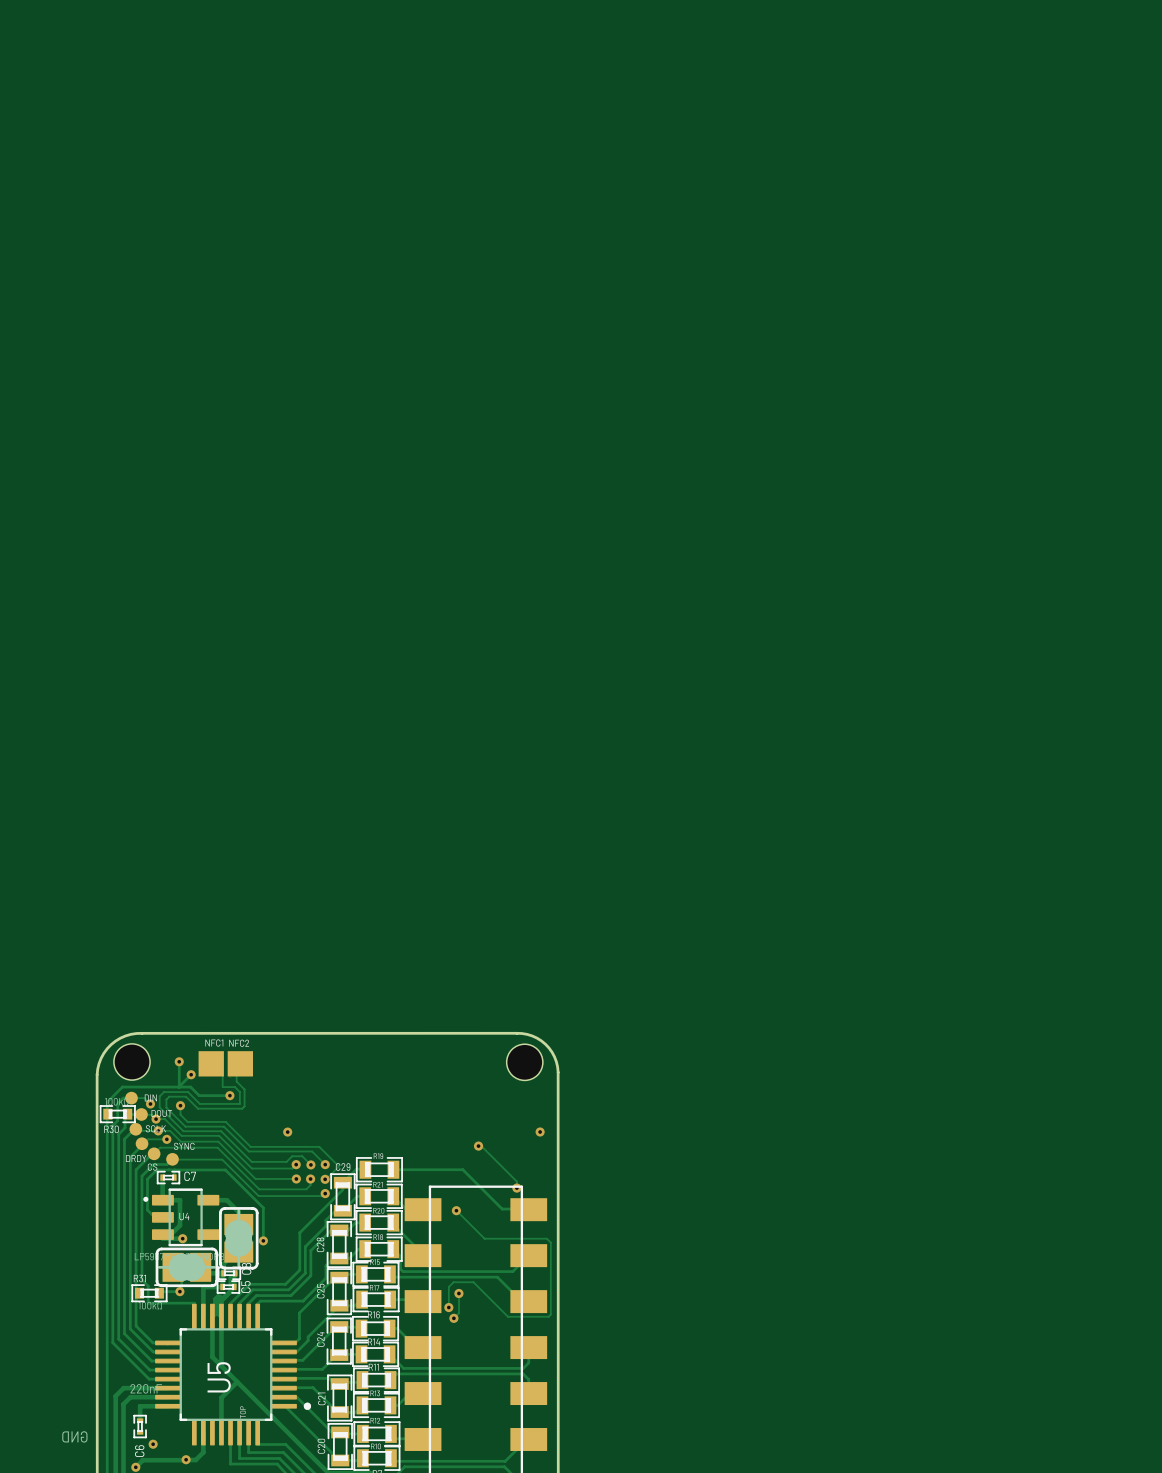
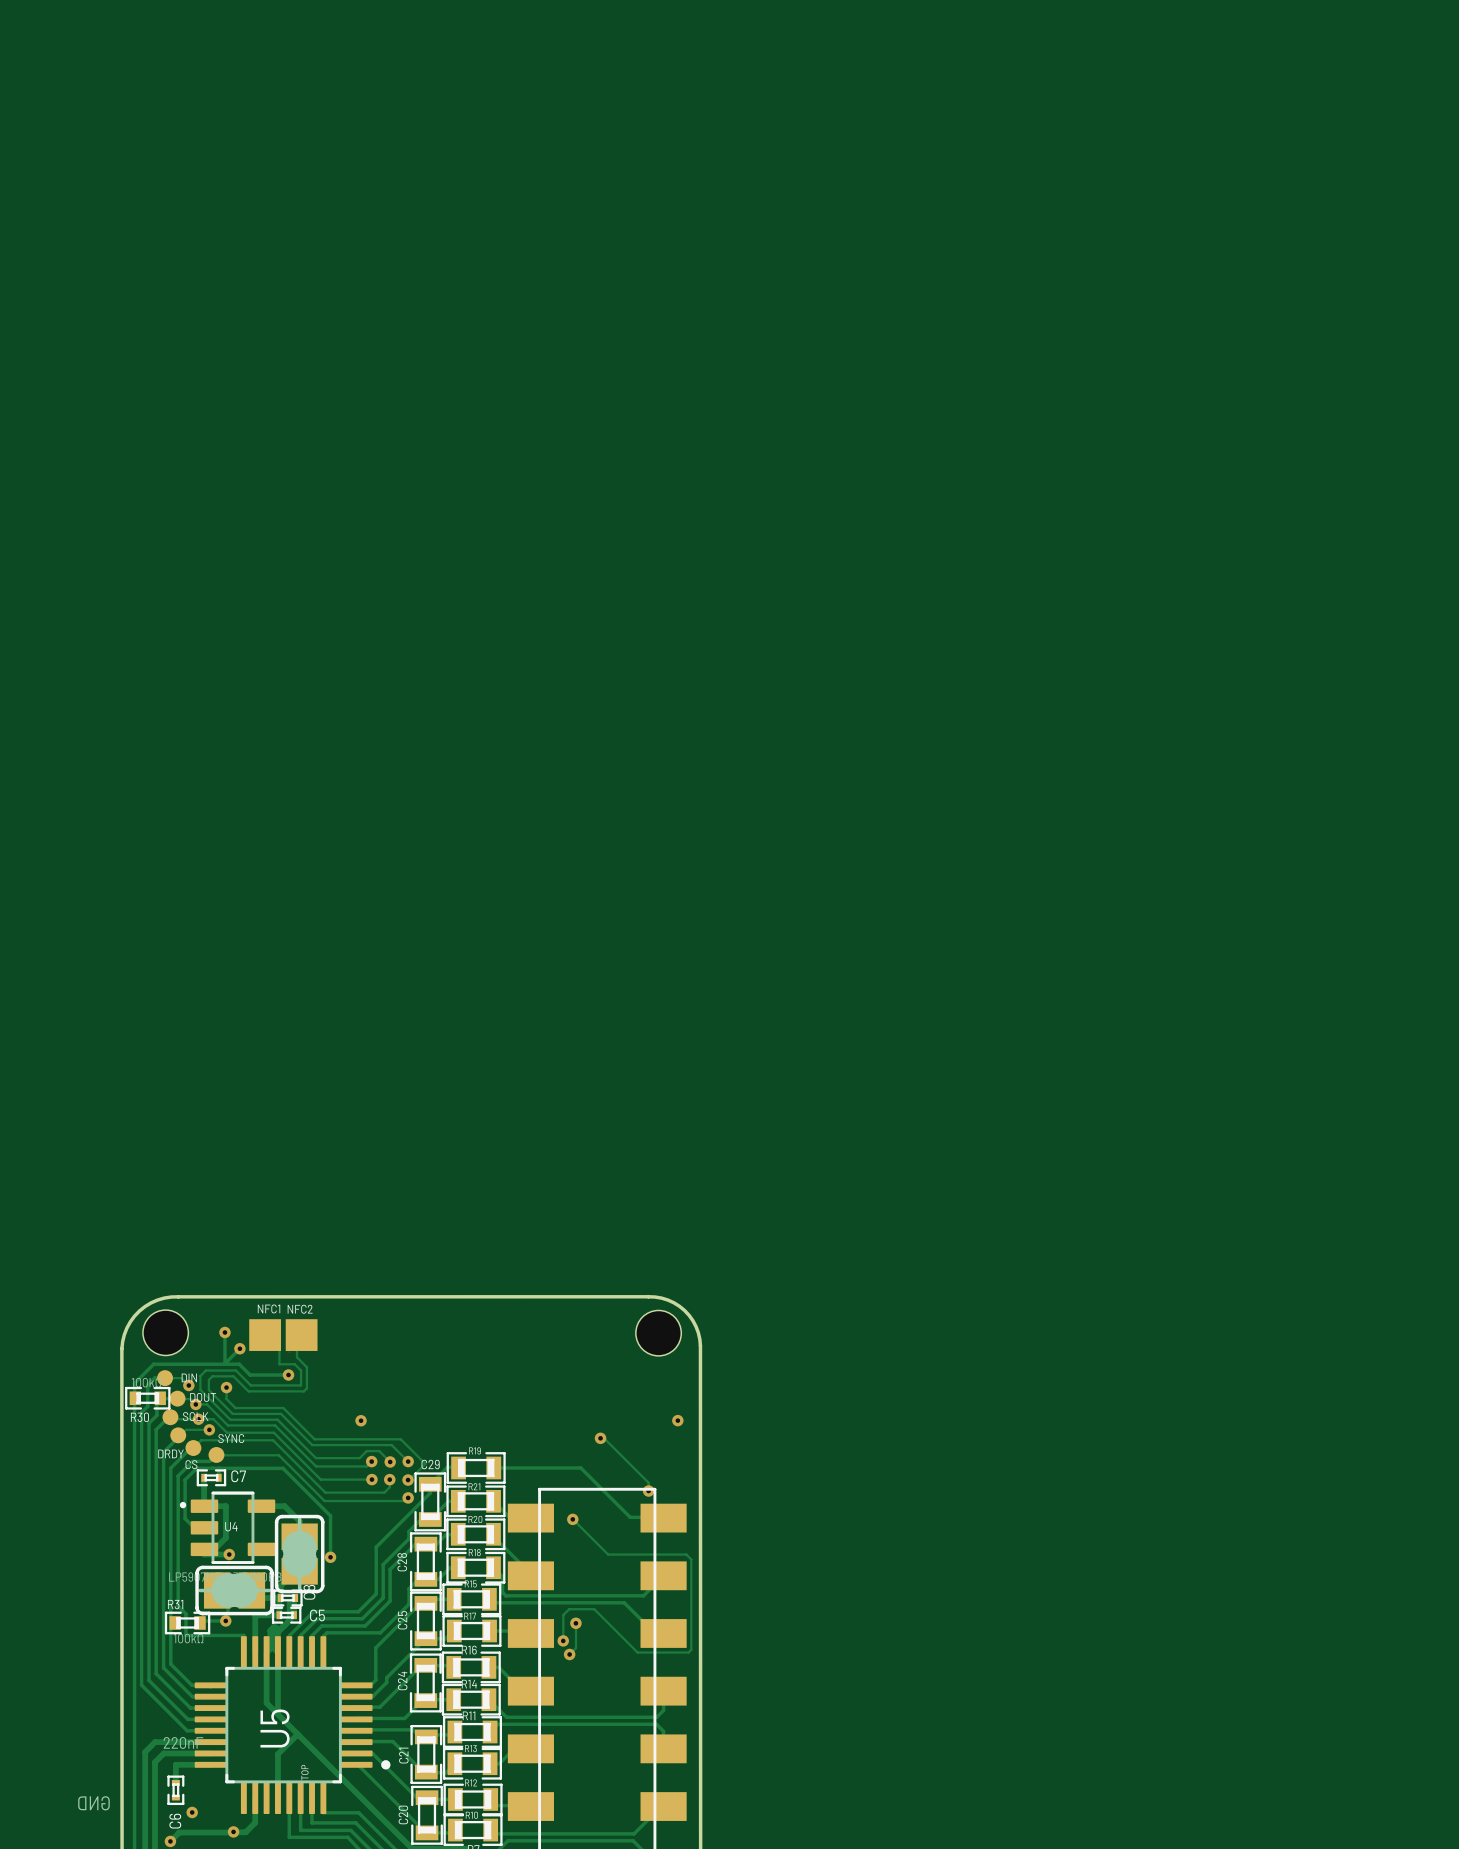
C5 name rotation: 0° (245, 1287) -> 90° clockwise (317, 1615)

